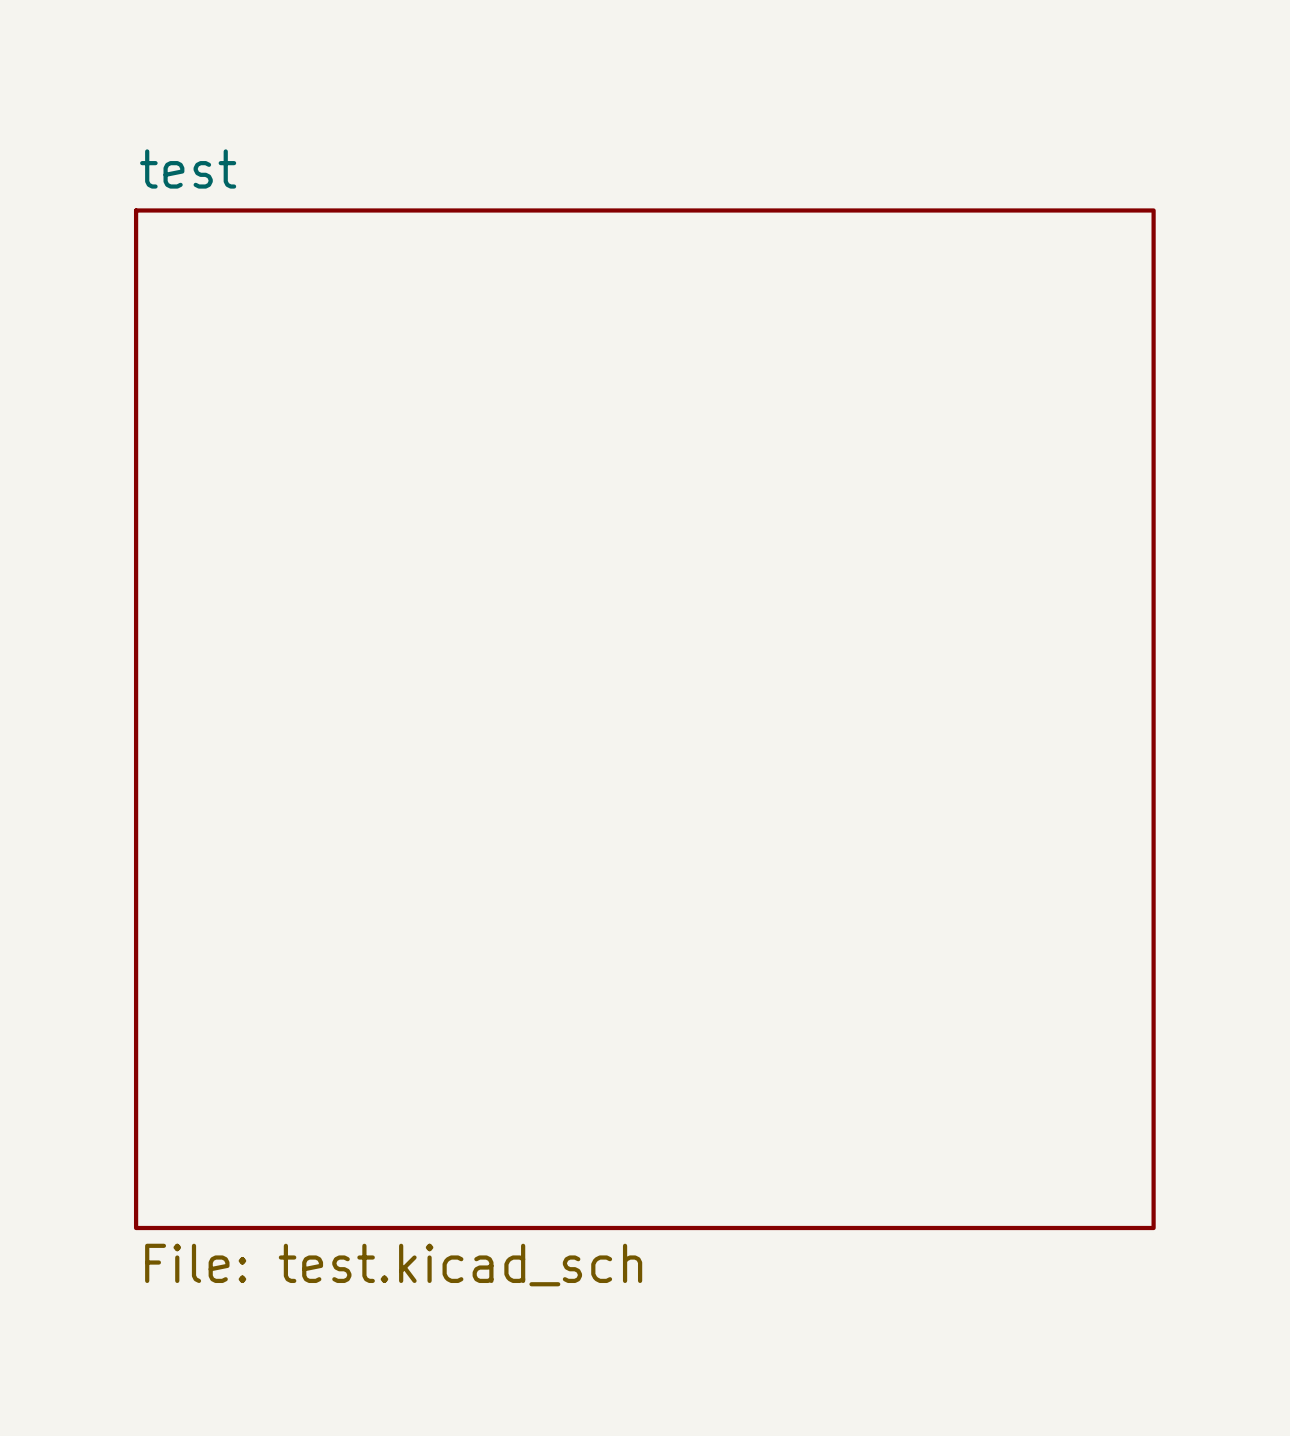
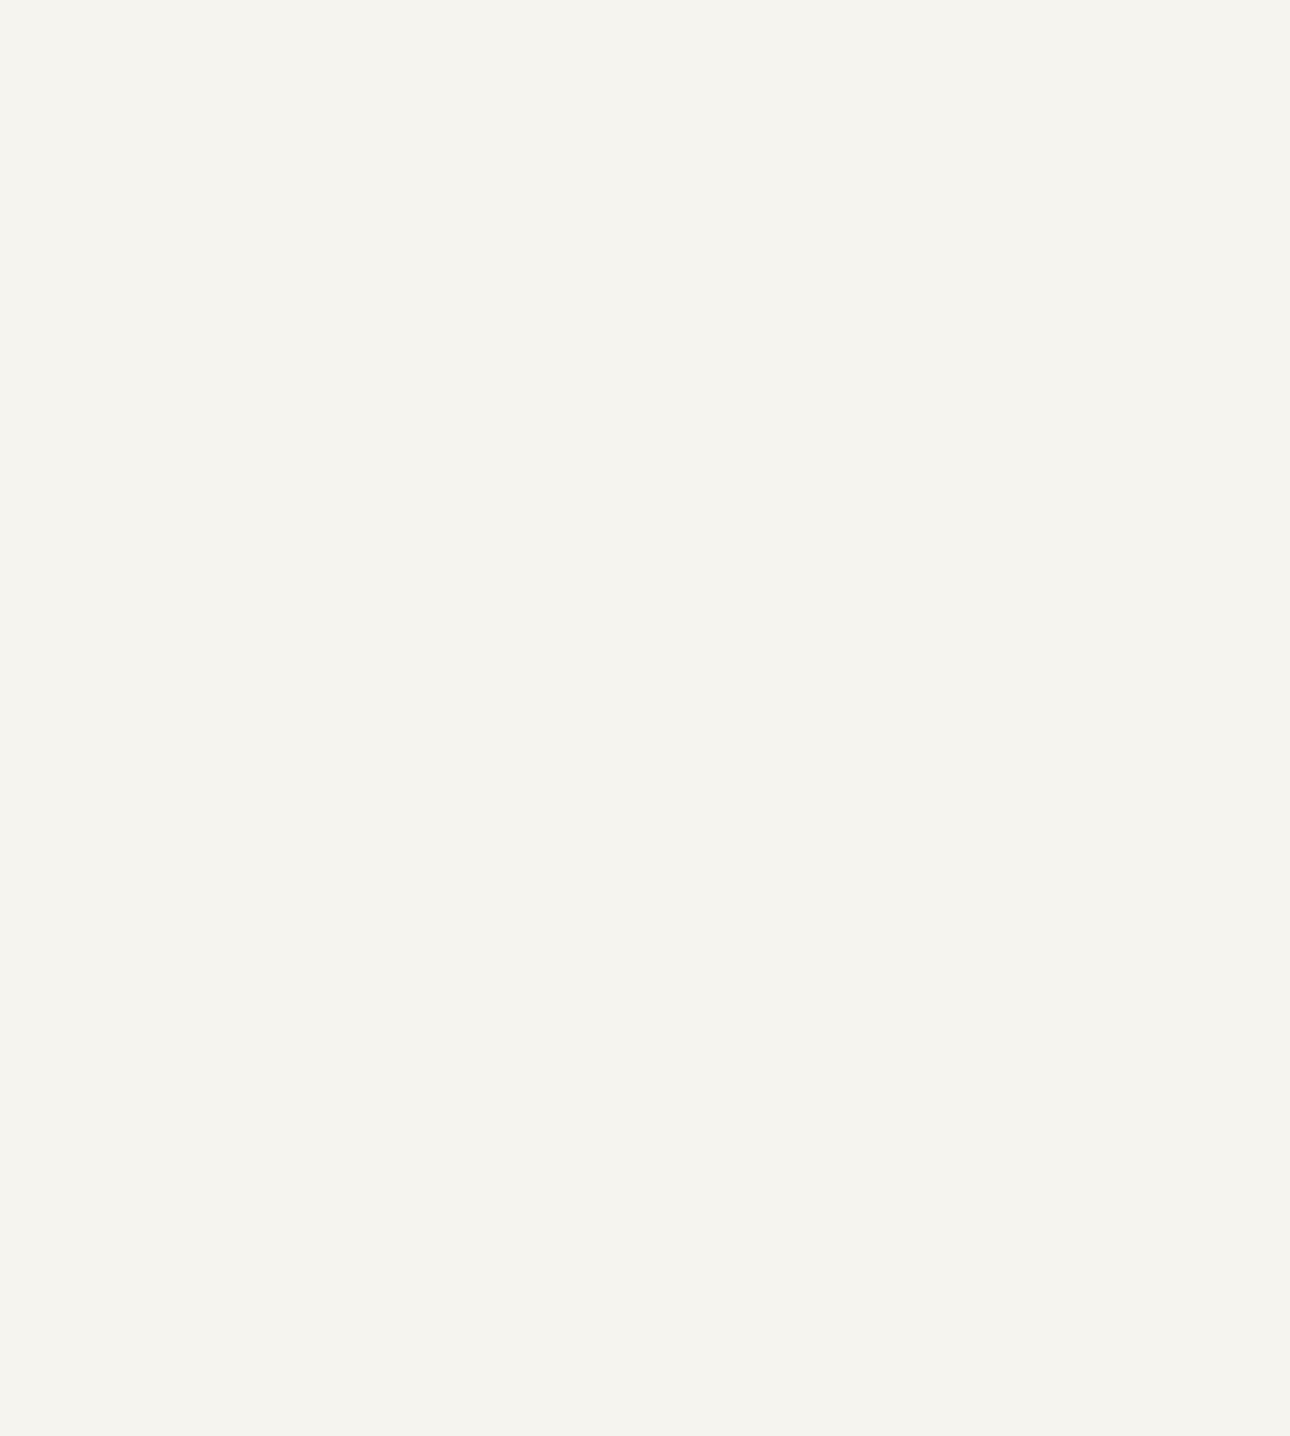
sheet test: File: test.kicad_sch (644, 719) -> none

